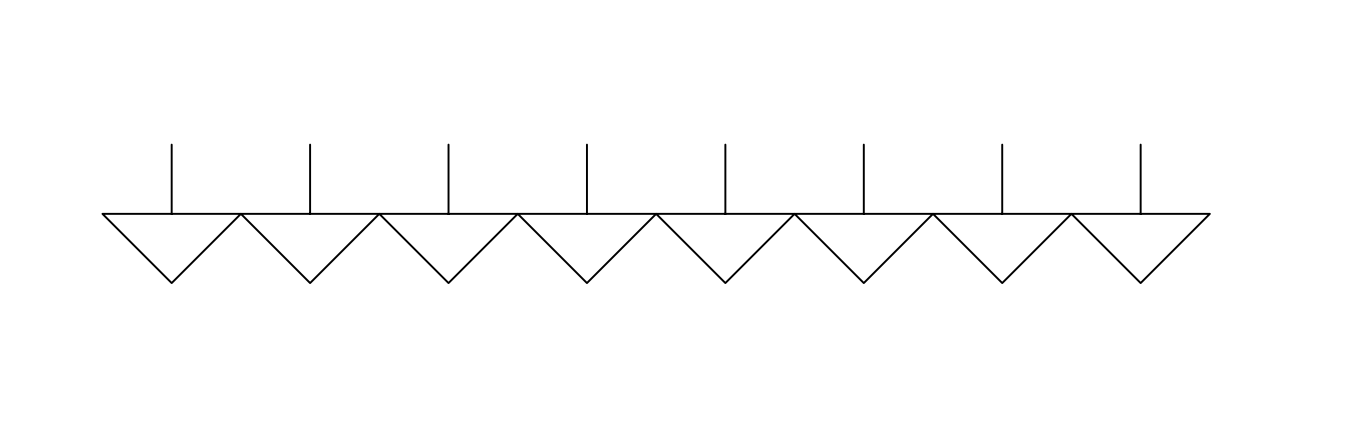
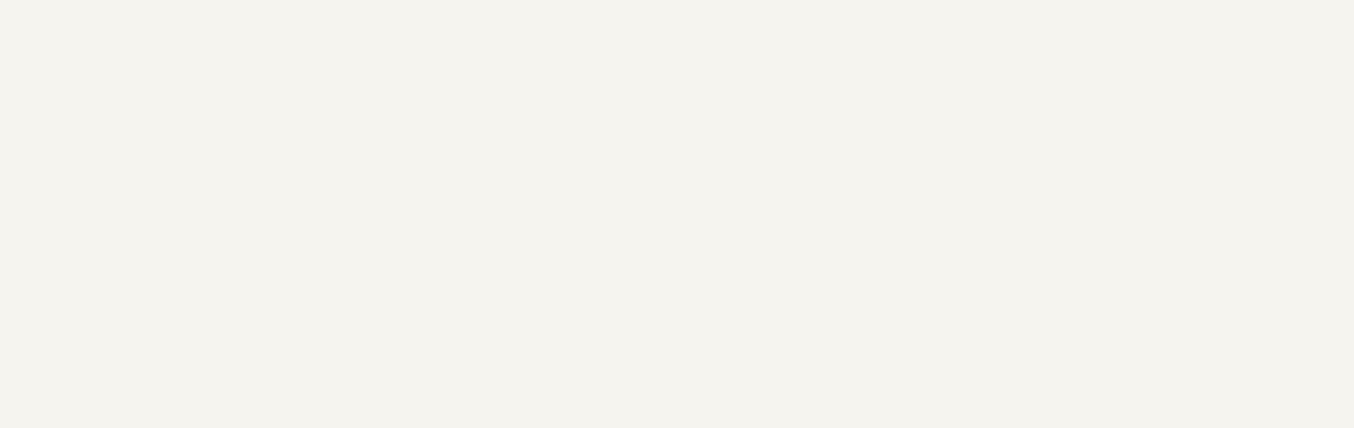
power symbol: (171, 213) -> none
power symbol: (310, 213) -> none
power symbol: (448, 213) -> none
power symbol: (586, 213) -> none
power symbol: (725, 213) -> none
power symbol: (863, 213) -> none
power symbol: (1002, 213) -> none
power symbol: (1140, 213) -> none

